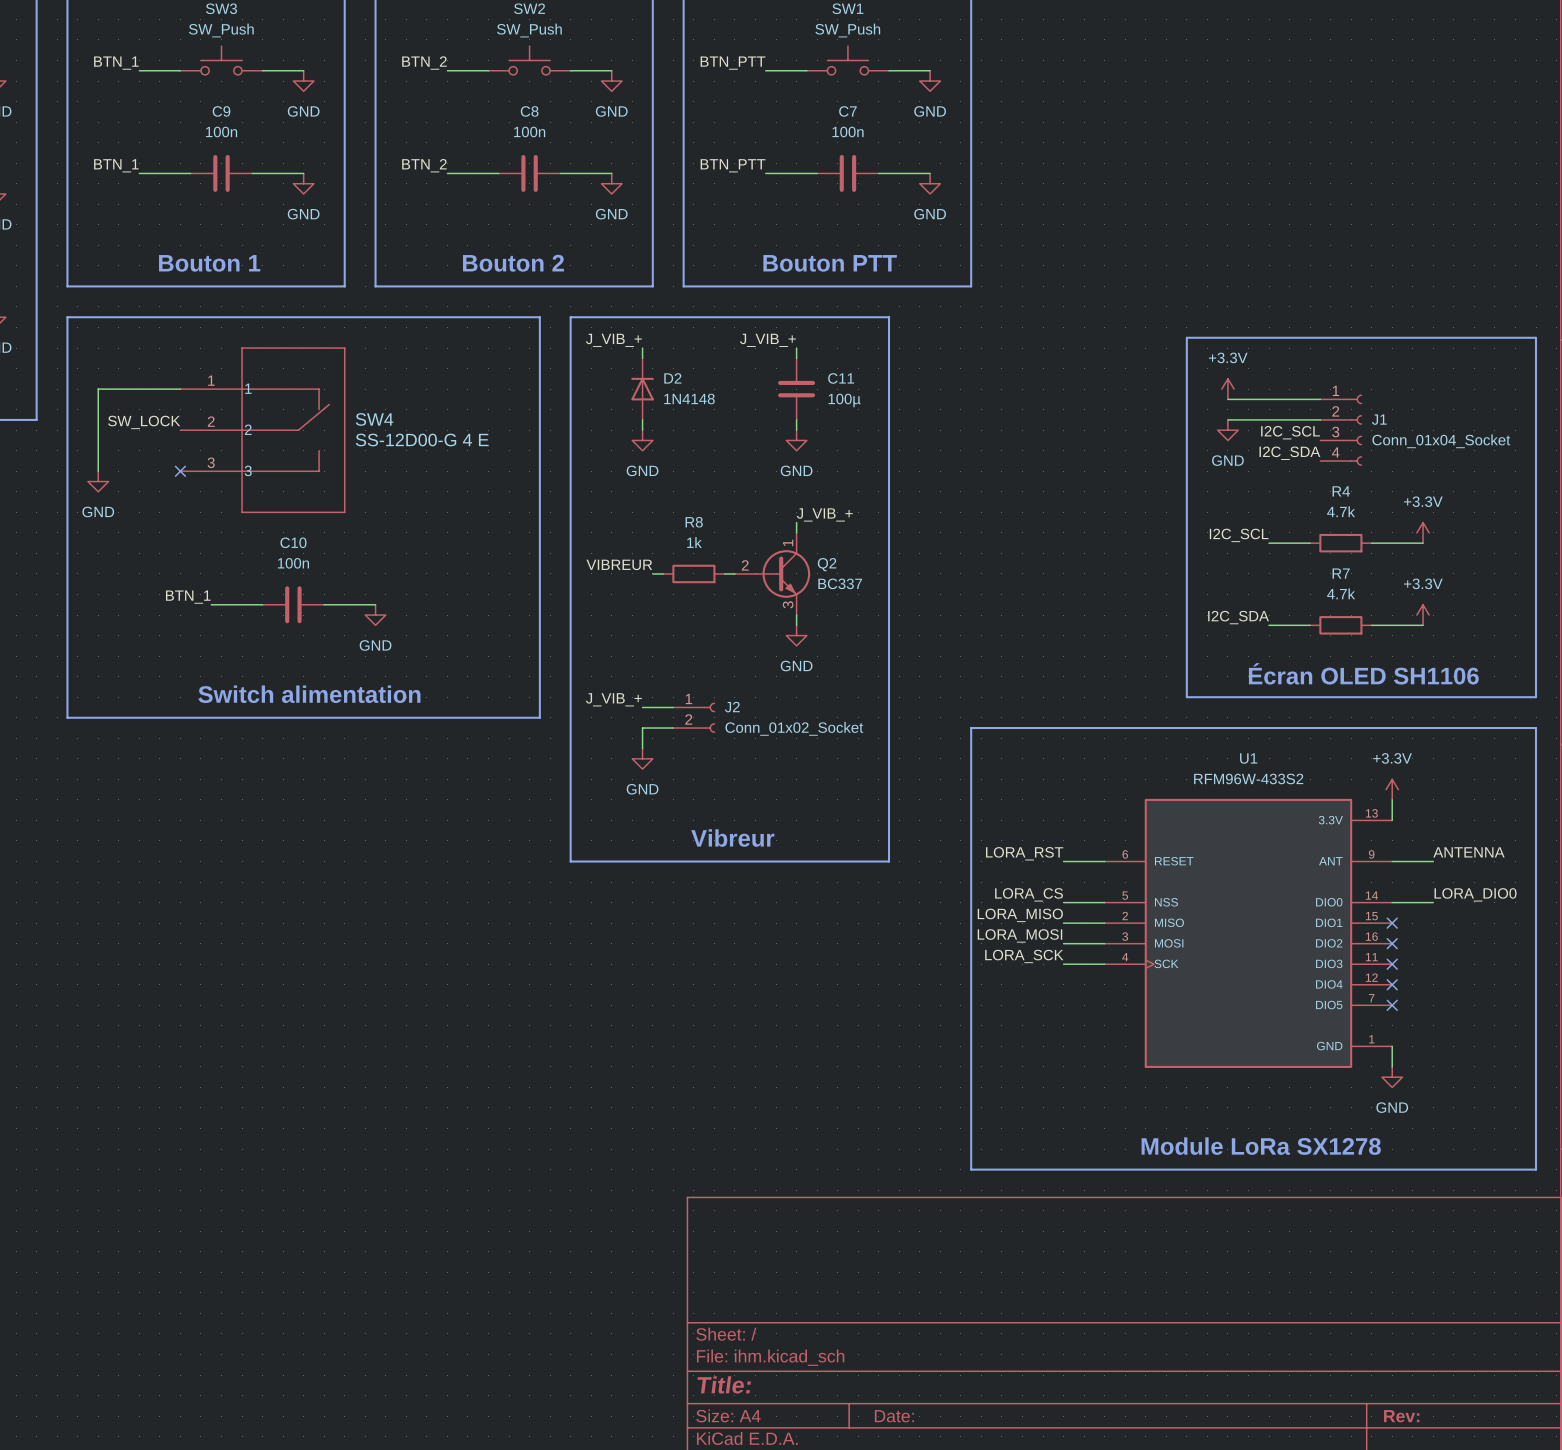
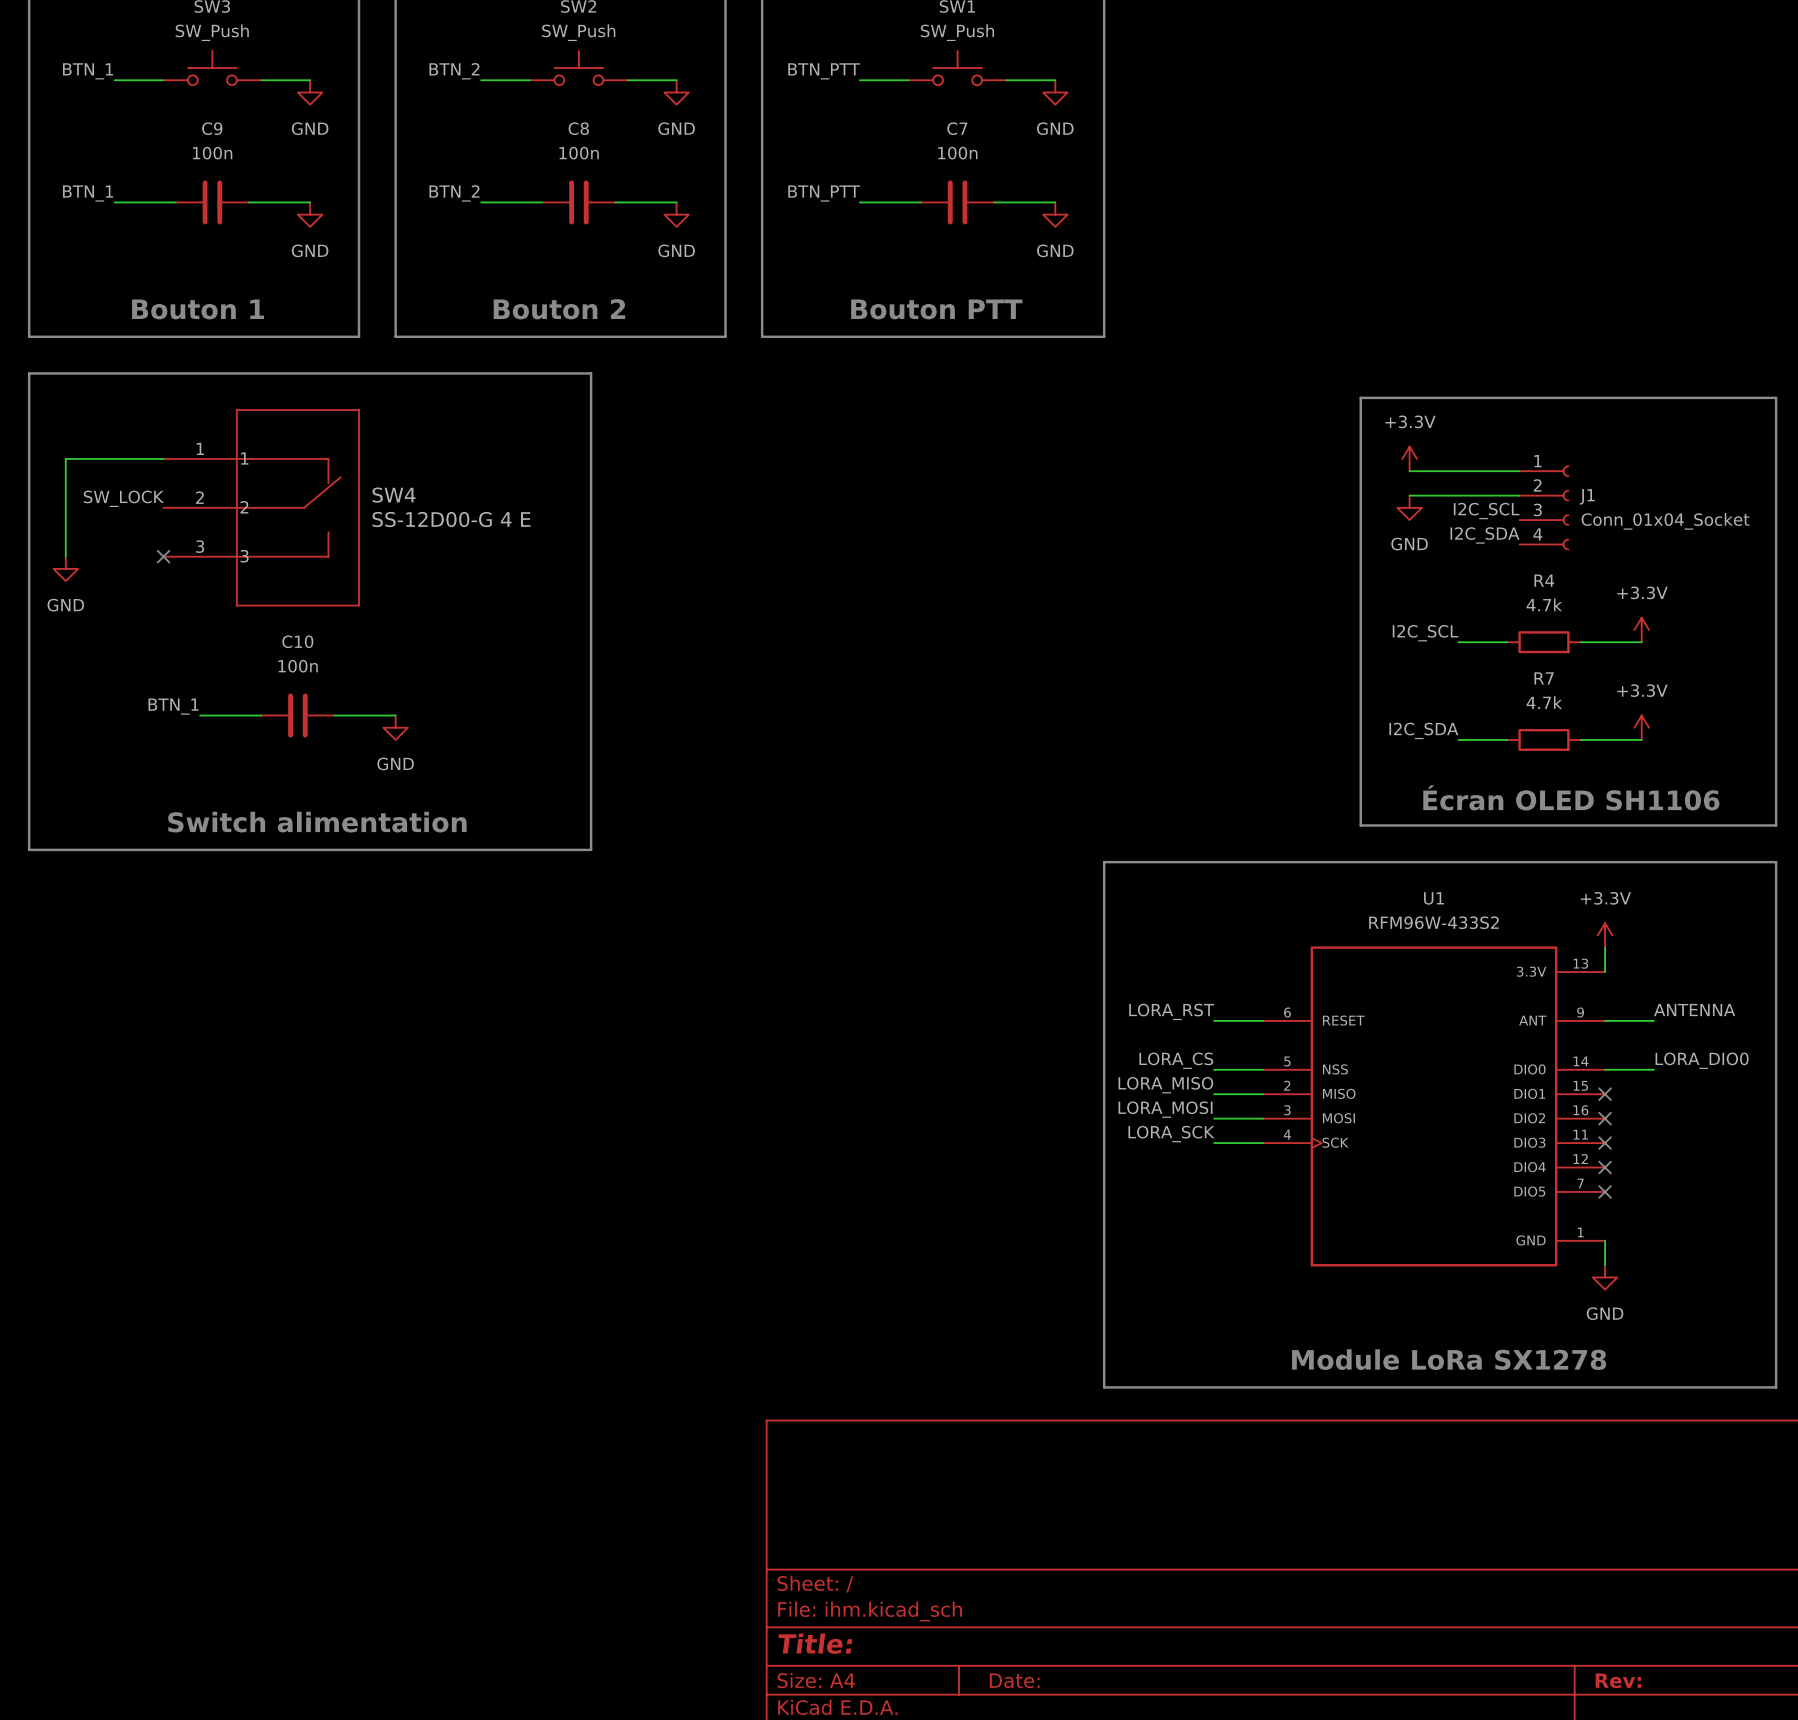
line: (570, 317) (889, 317) (889, 861) (570, 861) (570, 317) -> none
label: J_VIB_+ (613, 340) -> none
label: J_VIB_+ (767, 340) -> none
wire: (642, 348) (642, 358) -> none
wire: (796, 348) (796, 358) -> none
D2: 1N4148 (642, 389) -> none
C11: 100µ (796, 389) -> none
wire: (642, 419) (642, 430) -> none
wire: (796, 419) (796, 430) -> none
power symbol: GND (642, 440) -> none
power symbol: GND (796, 440) -> none
label: J_VIB_+ (824, 514) -> none
wire: (796, 522) (796, 532) -> none
label: VIBREUR (619, 564) -> none
wire: (652, 573) (663, 573) -> none
R8: 1k (693, 573) -> none
wire: (724, 573) (734, 573) -> none
Q2: BC337 (772, 573) -> none
wire: (796, 615) (796, 625) -> none
power symbol: GND (796, 635) -> none
label: J_VIB_+ (613, 699) -> none
wire: (642, 707) (673, 707) -> none
J2: Conn_01x02_Socket (694, 717) -> none
wire: (673, 728) (642, 728) (642, 748) -> none
power symbol: GND (642, 758) -> none
text: Vibreur (732, 838) -> none

